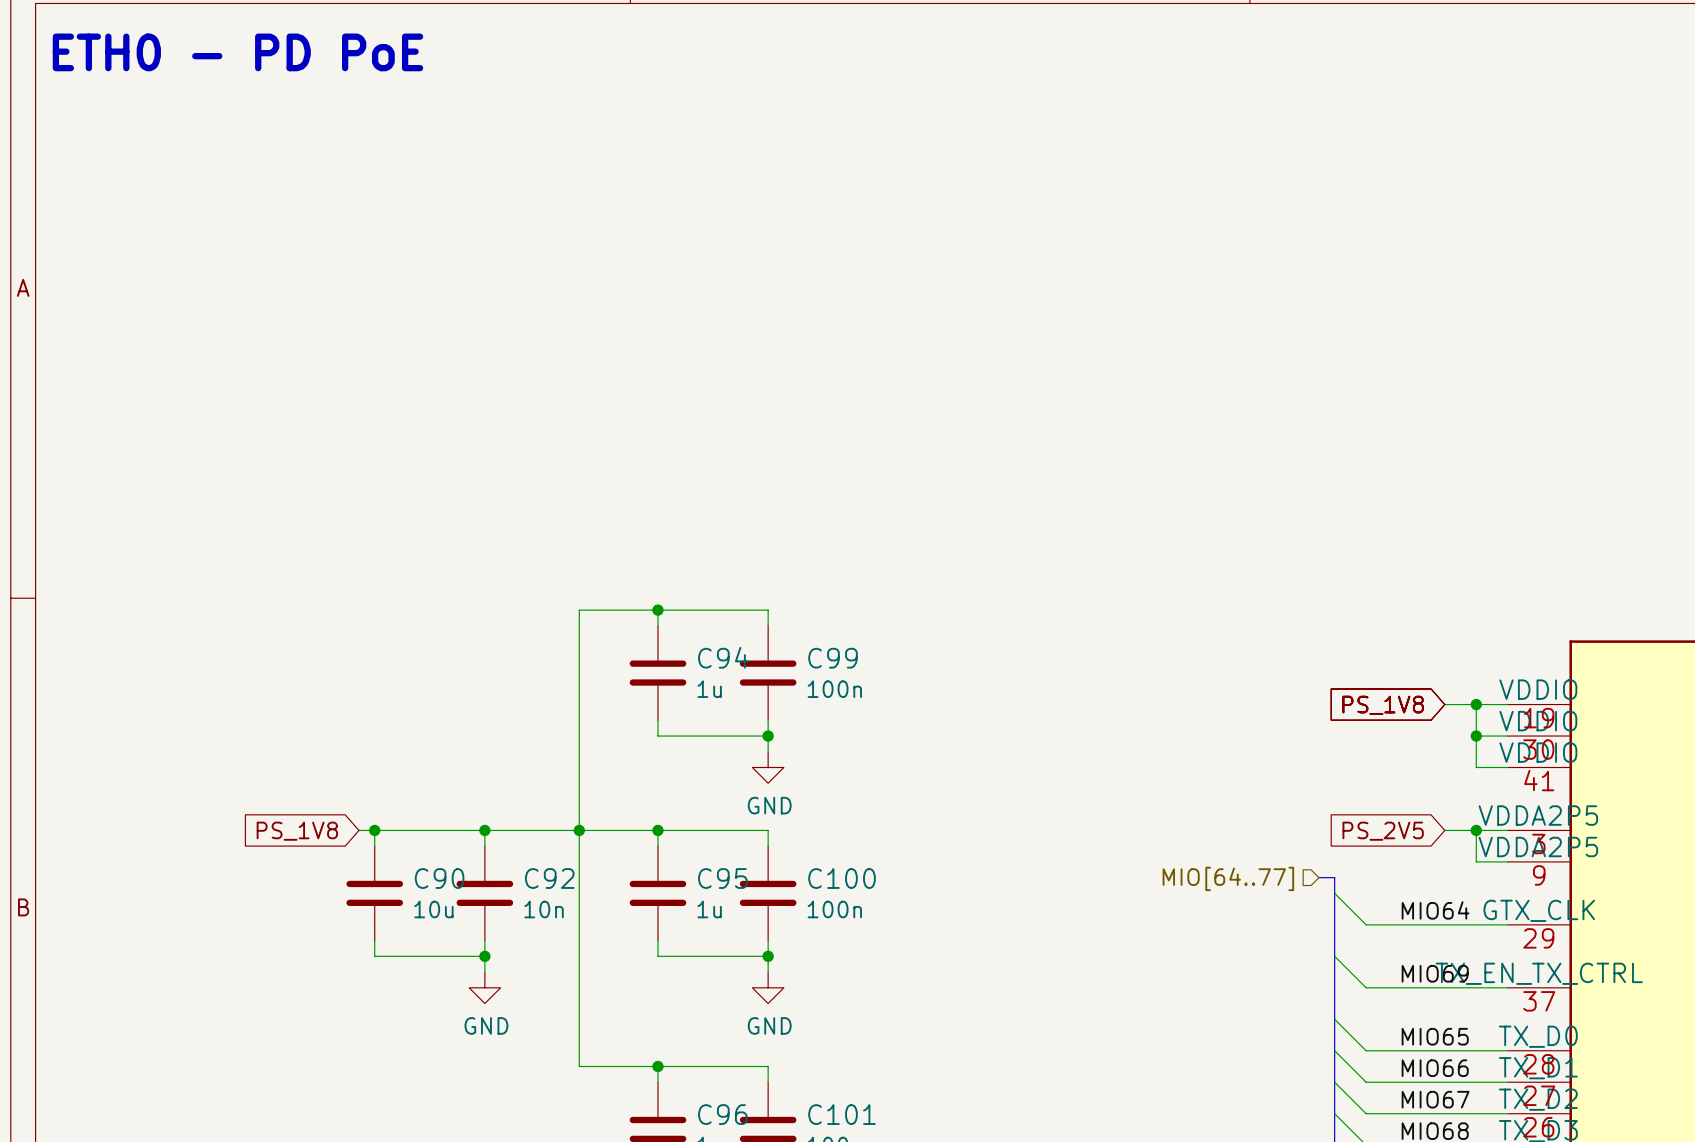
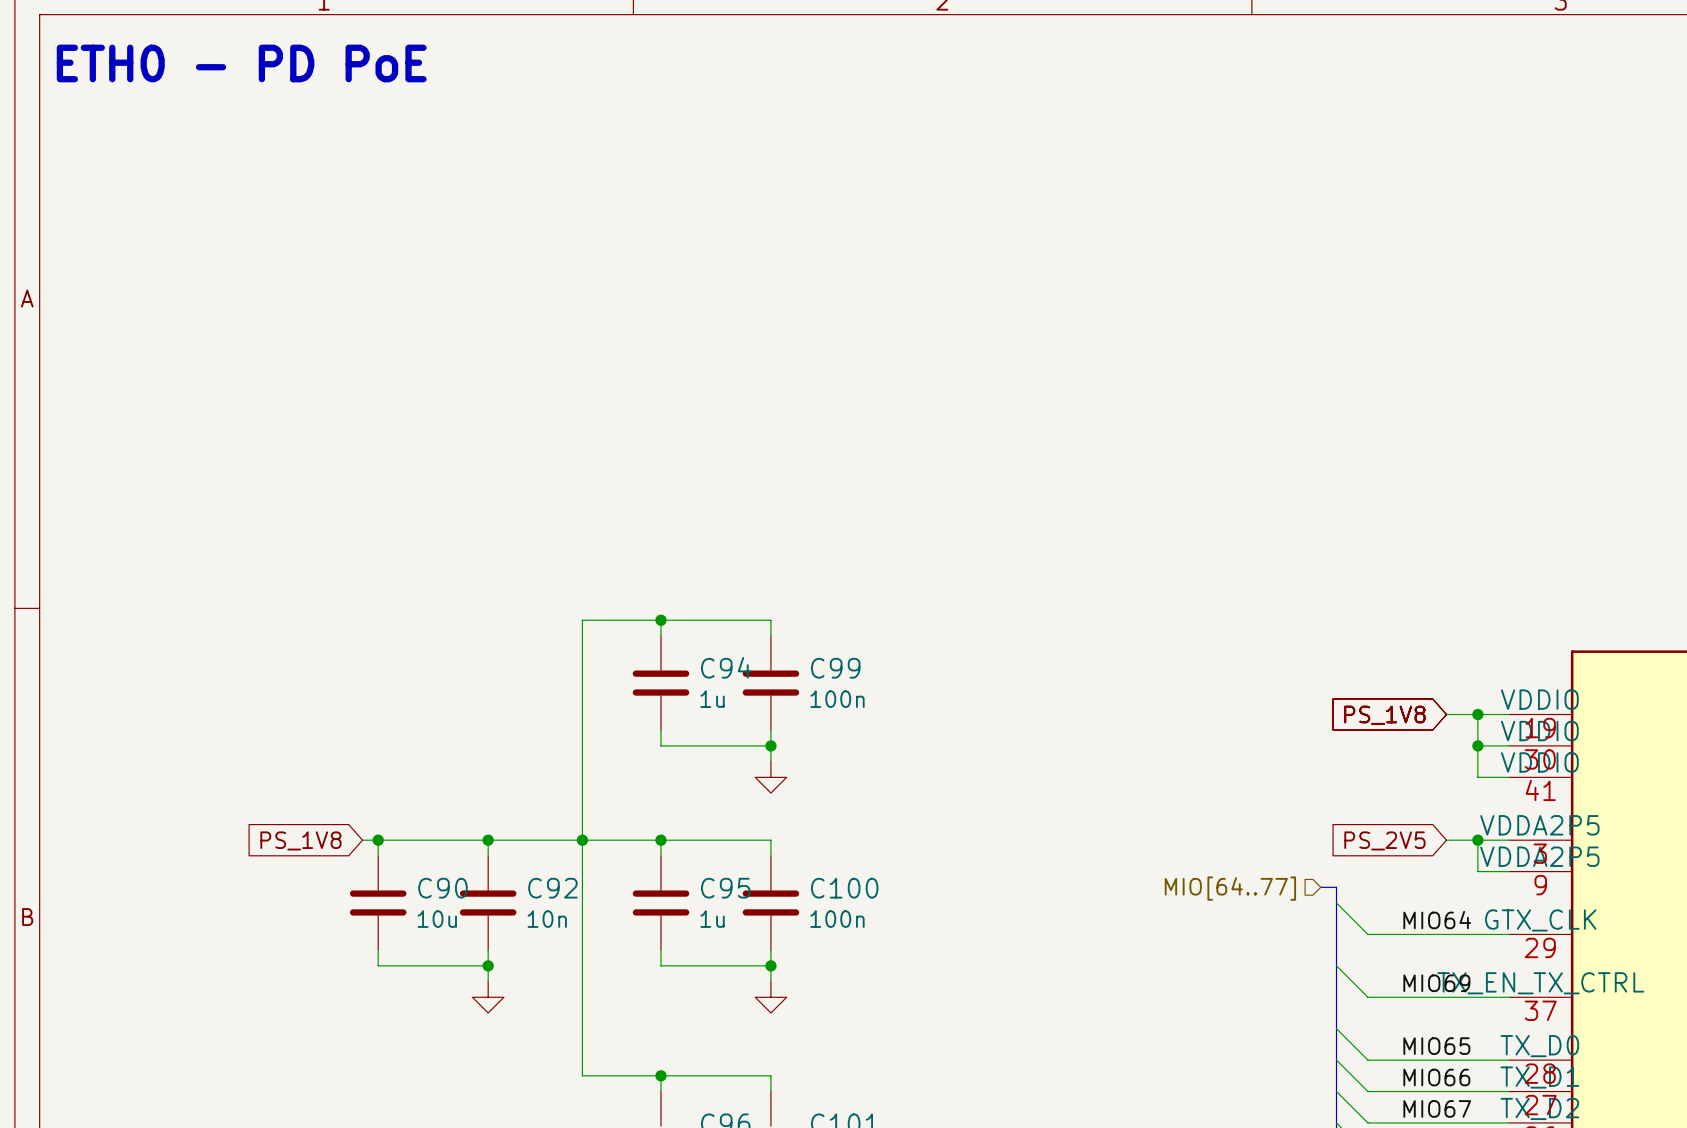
power symbol text: GND (769, 805) -> none
power symbol text: GND (486, 1025) -> none
power symbol text: GND (769, 1025) -> none

